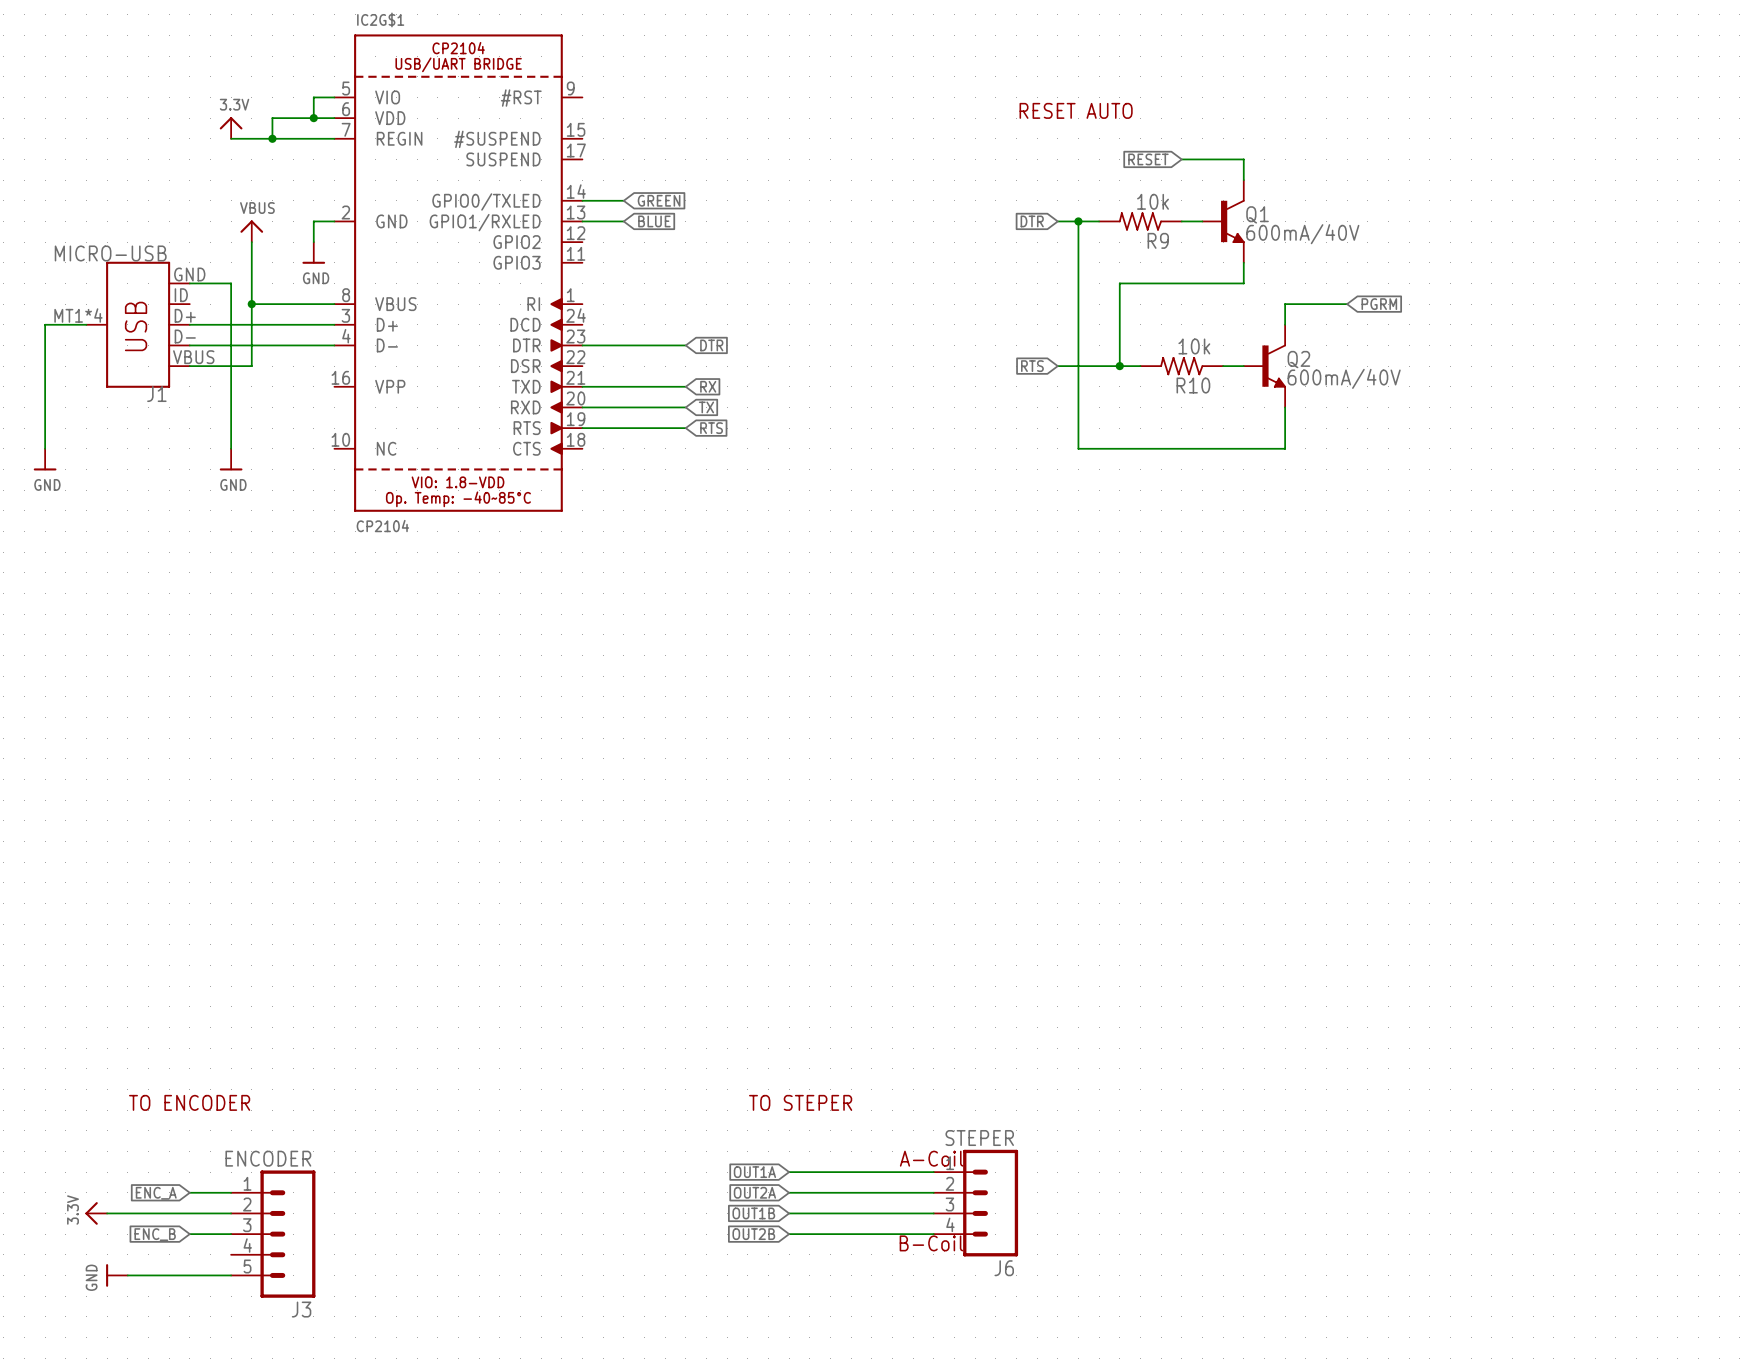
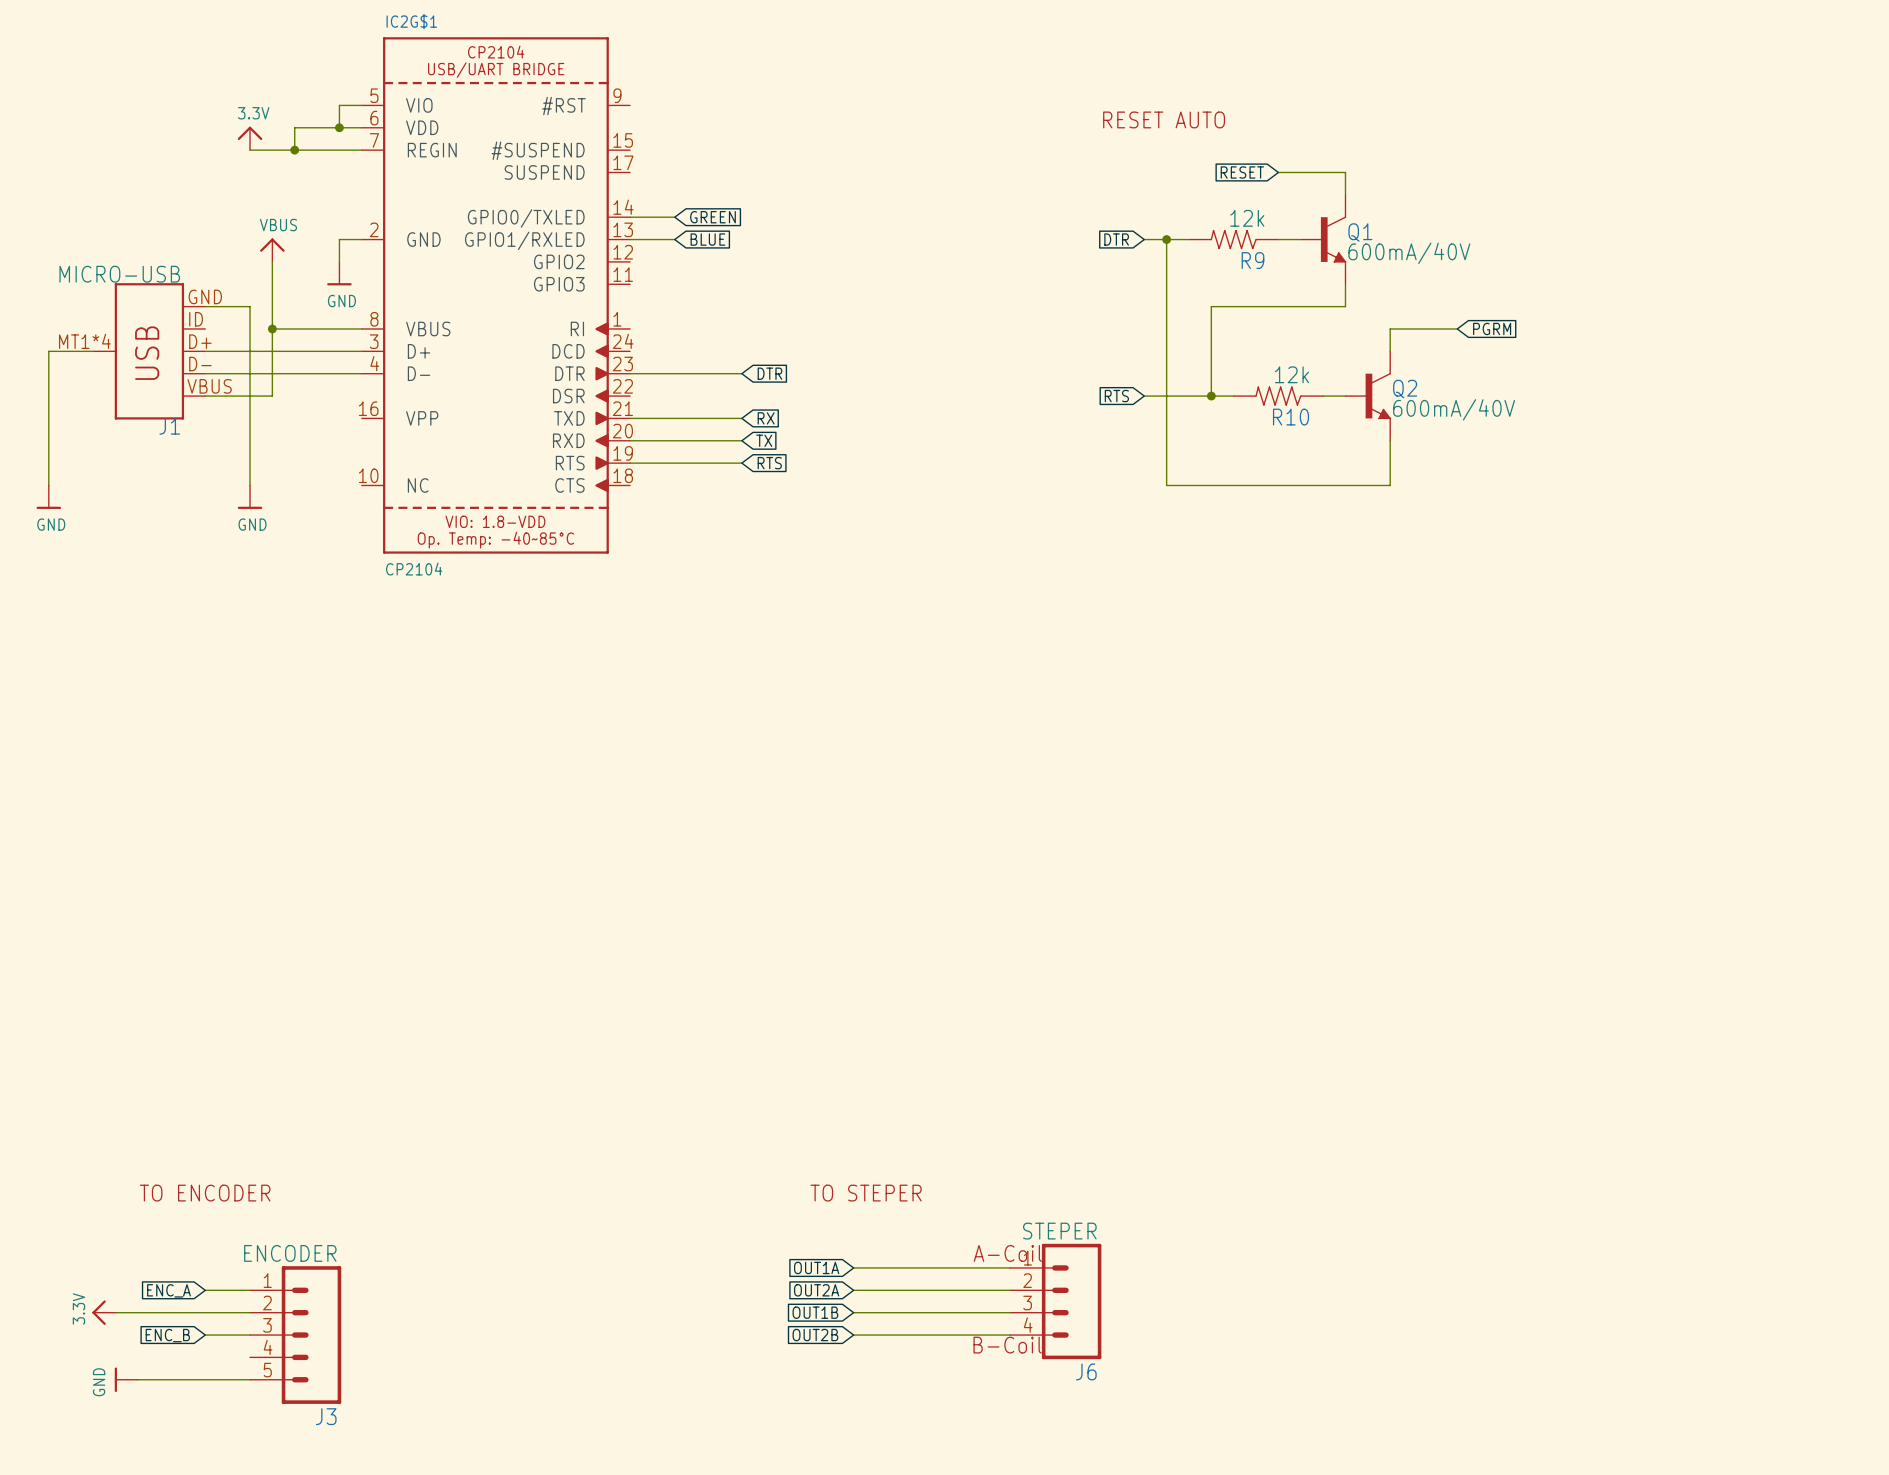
R9 value: 10k (1153, 201) -> 12k (1247, 218)
R10 value: 10k (1194, 346) -> 12k (1292, 374)

